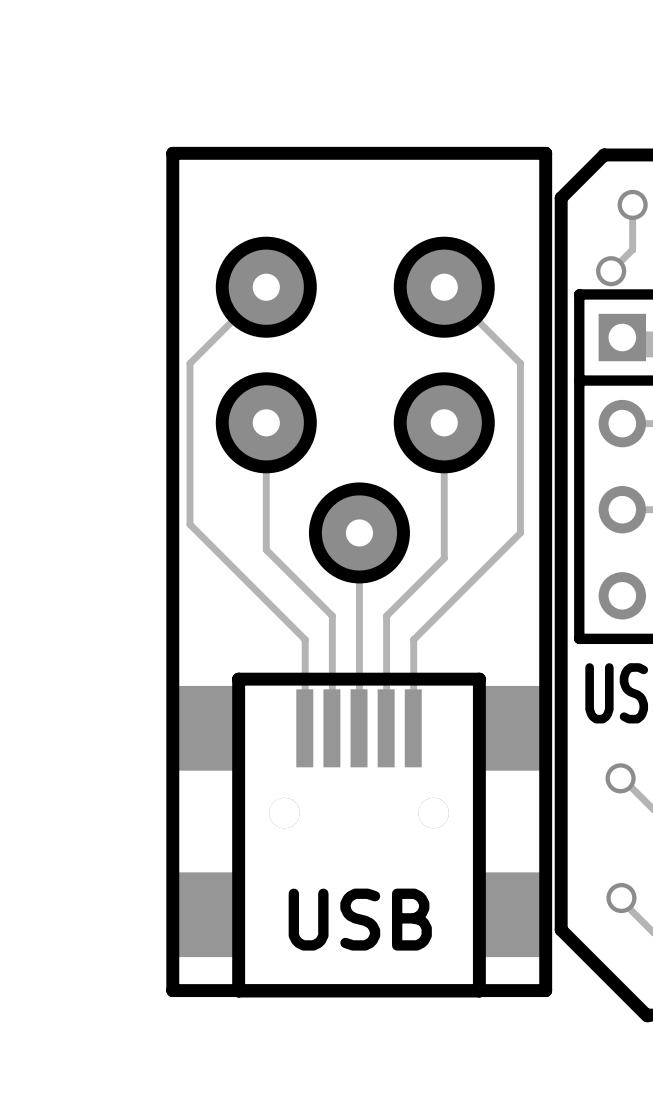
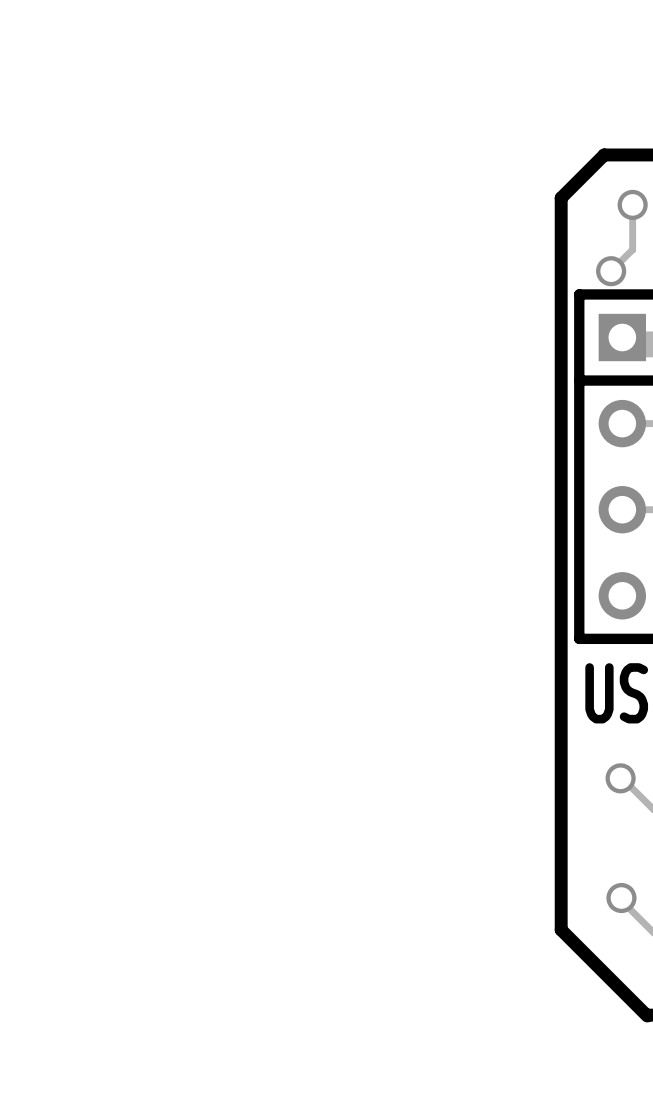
board edge: (172, 153) (545, 153) (545, 990) (172, 990) (172, 153) -> none
track: (266, 287) (190, 363) (190, 524) (305, 639) (305, 727) -> none
part: (266, 287) -> none
track: (444, 287) (520, 363) (520, 532) (413, 639) (413, 727) -> none
part: (444, 287) -> none
track: (266, 422) (266, 549) (332, 615) (332, 727) -> none
part: (266, 422) -> none
track: (444, 422) (444, 558) (386, 616) (386, 727) -> none
part: (444, 422) -> none
track: (359, 532) (359, 727) -> none
part: (359, 532) -> none
USB: (359, 835) -> none

